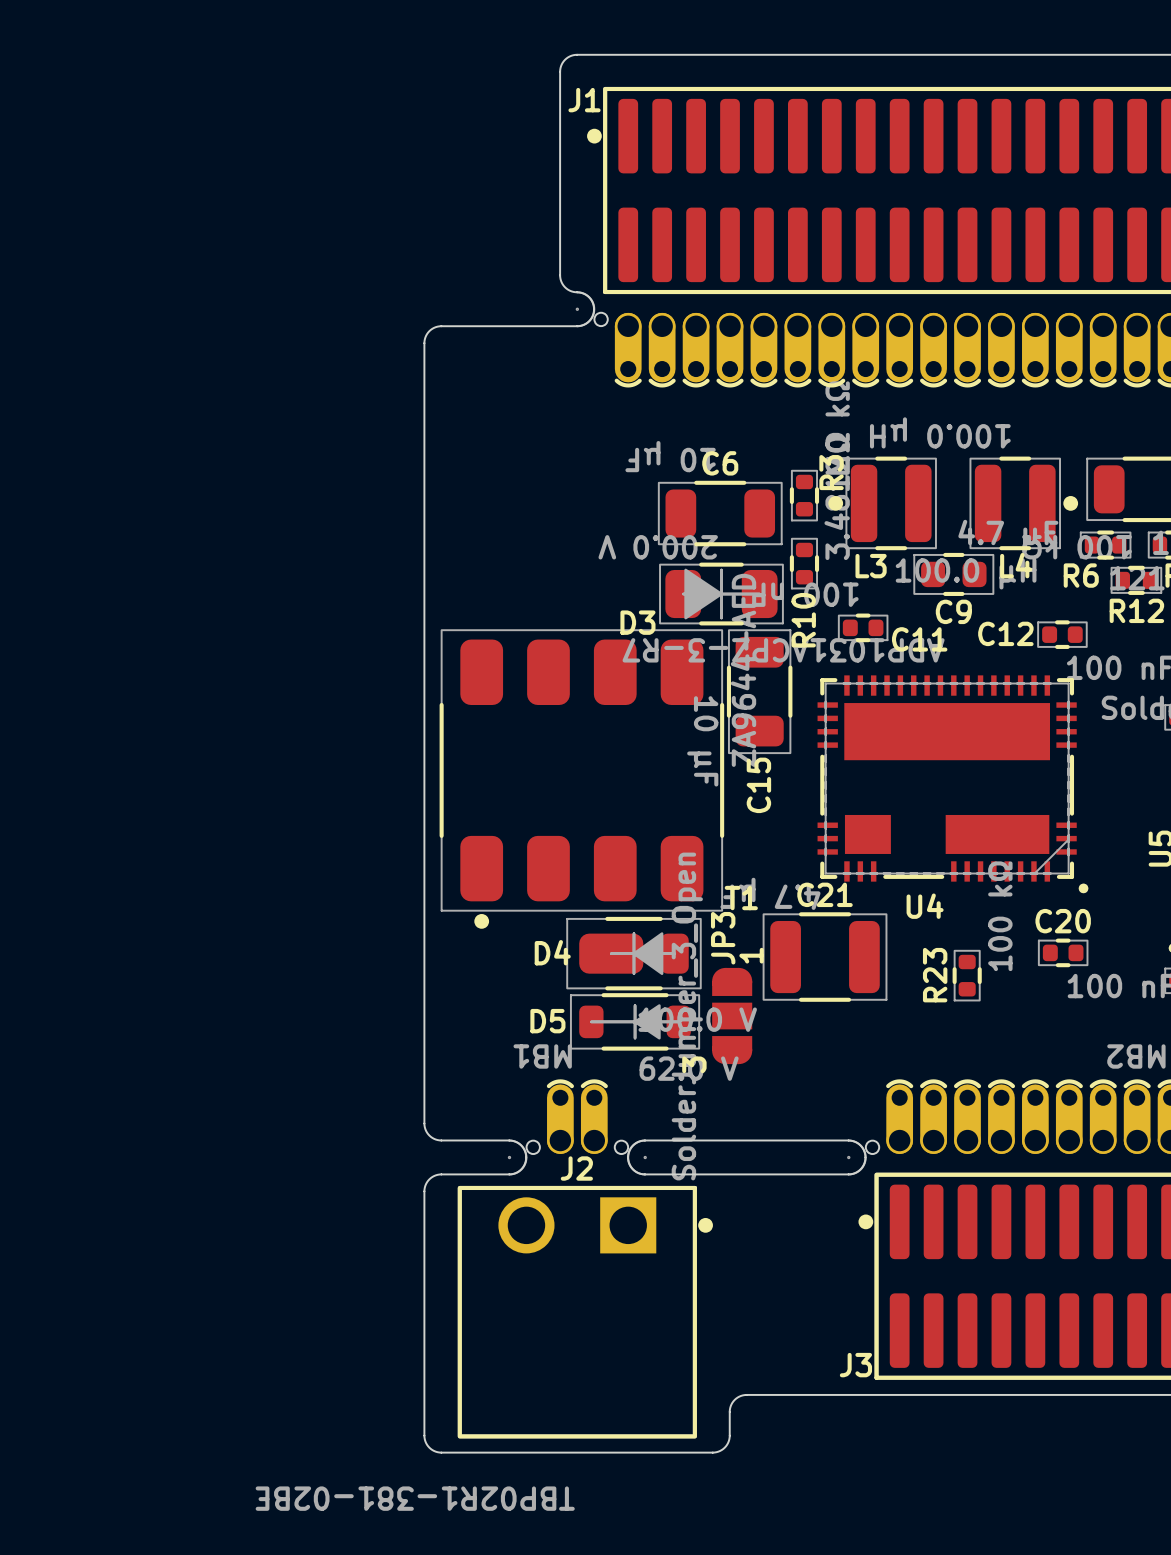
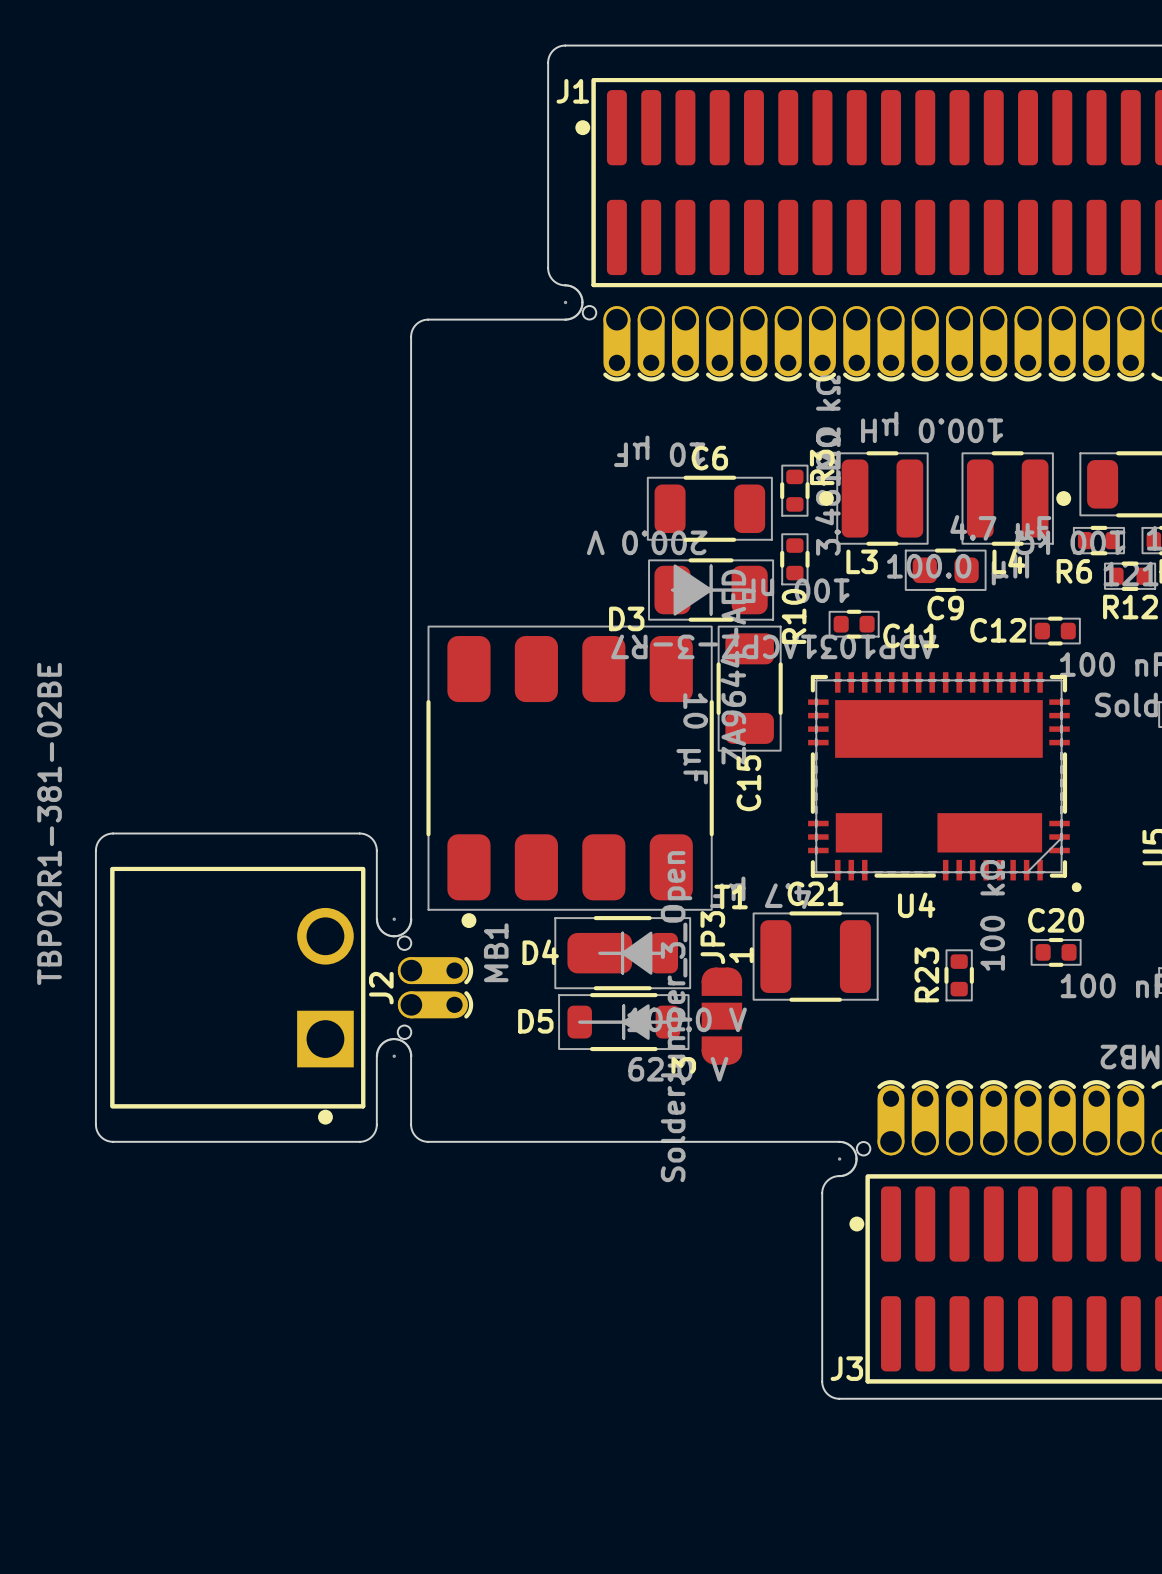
board edge: (424, 919) (424, 1055) -> (411, 919) (407, 929) (399, 935) (388, 935) (379, 928) (376, 919) (376, 848) (373, 839) (363, 833) (113, 833) (103, 836) (98, 841) (95, 850) (96, 1128) (102, 1138) (113, 1141) (363, 1141) (373, 1135) (376, 1126) (376, 1056) (379, 1047) (388, 1040) (399, 1040) (407, 1045) (411, 1056)
part: none -> (435, 970)
part: none -> (435, 1004)
part: (560, 1116) -> none
part: (594, 1116) -> none
board edge: (509, 1140) (518, 1143) (525, 1151) (525, 1163) (518, 1171) (509, 1174) (439, 1174) (429, 1179) (424, 1187) (424, 1435) (426, 1443) (430, 1448) (441, 1452) (714, 1452) (723, 1448) (728, 1443) (730, 1408) (733, 1401) (739, 1396) (746, 1394) (848, 1394) -> (496, 1141) (633, 1141)
board edge: (644, 1140) (632, 1145) (628, 1155) (631, 1168) (643, 1174) (848, 1174) -> (839, 1398) (827, 1393) (822, 1381) (822, 1191) (827, 1181) (839, 1176)
MB1 rotation: 0° (577, 1157) -> 90° clockwise (394, 987)
MB1 position: (577, 1157) -> (394, 987)
J2 rotation: 0° (585, 1312) -> 90° clockwise (237, 995)
J2 position: (585, 1312) -> (237, 995)

